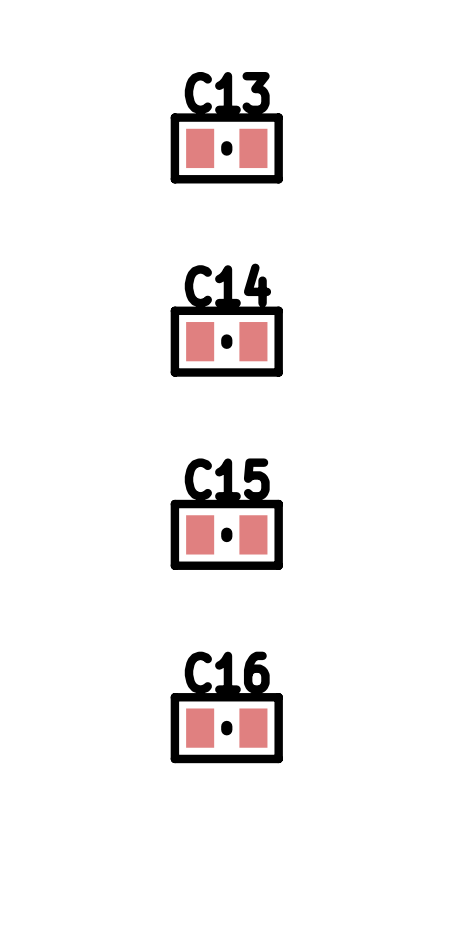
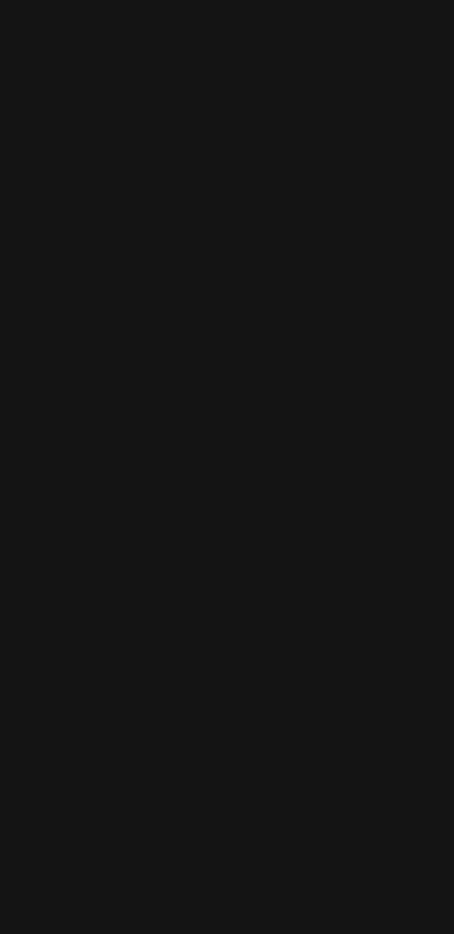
C13: (226, 148) -> none
C14: (226, 341) -> none
C15: (226, 534) -> none
C16: (226, 728) -> none

